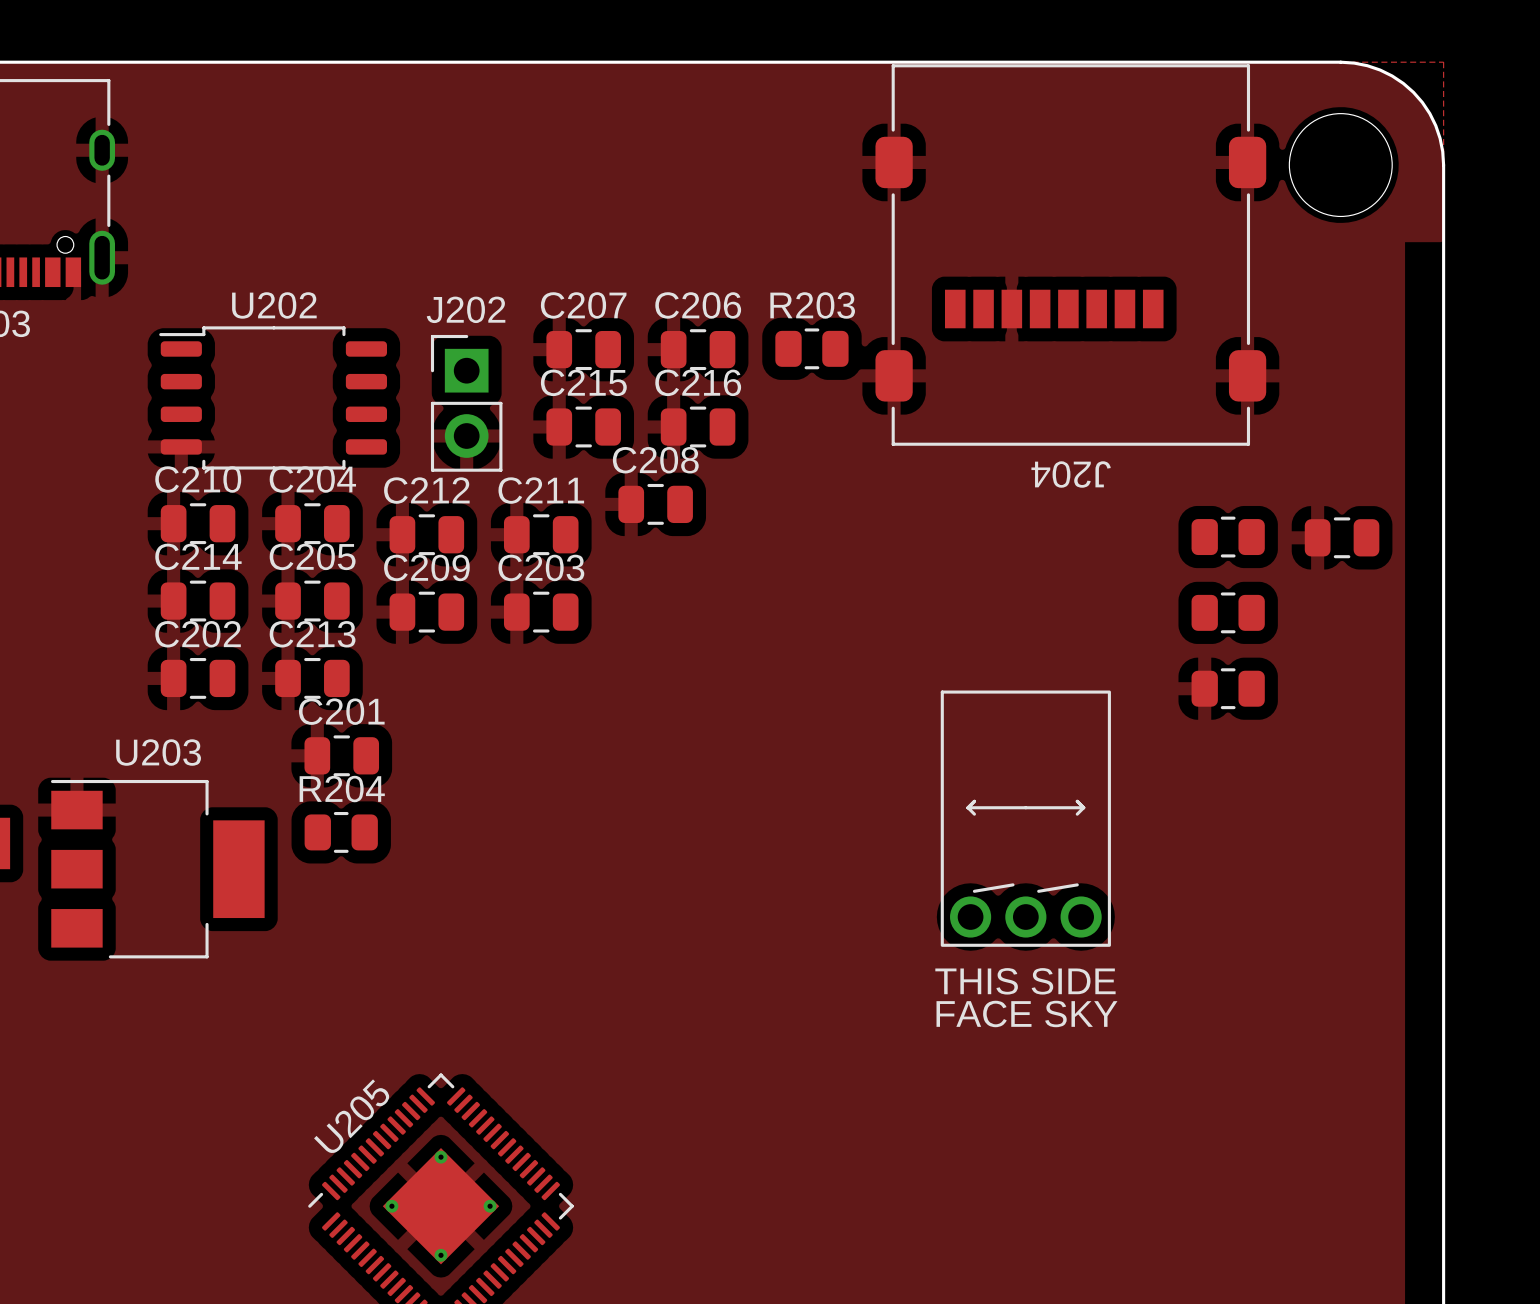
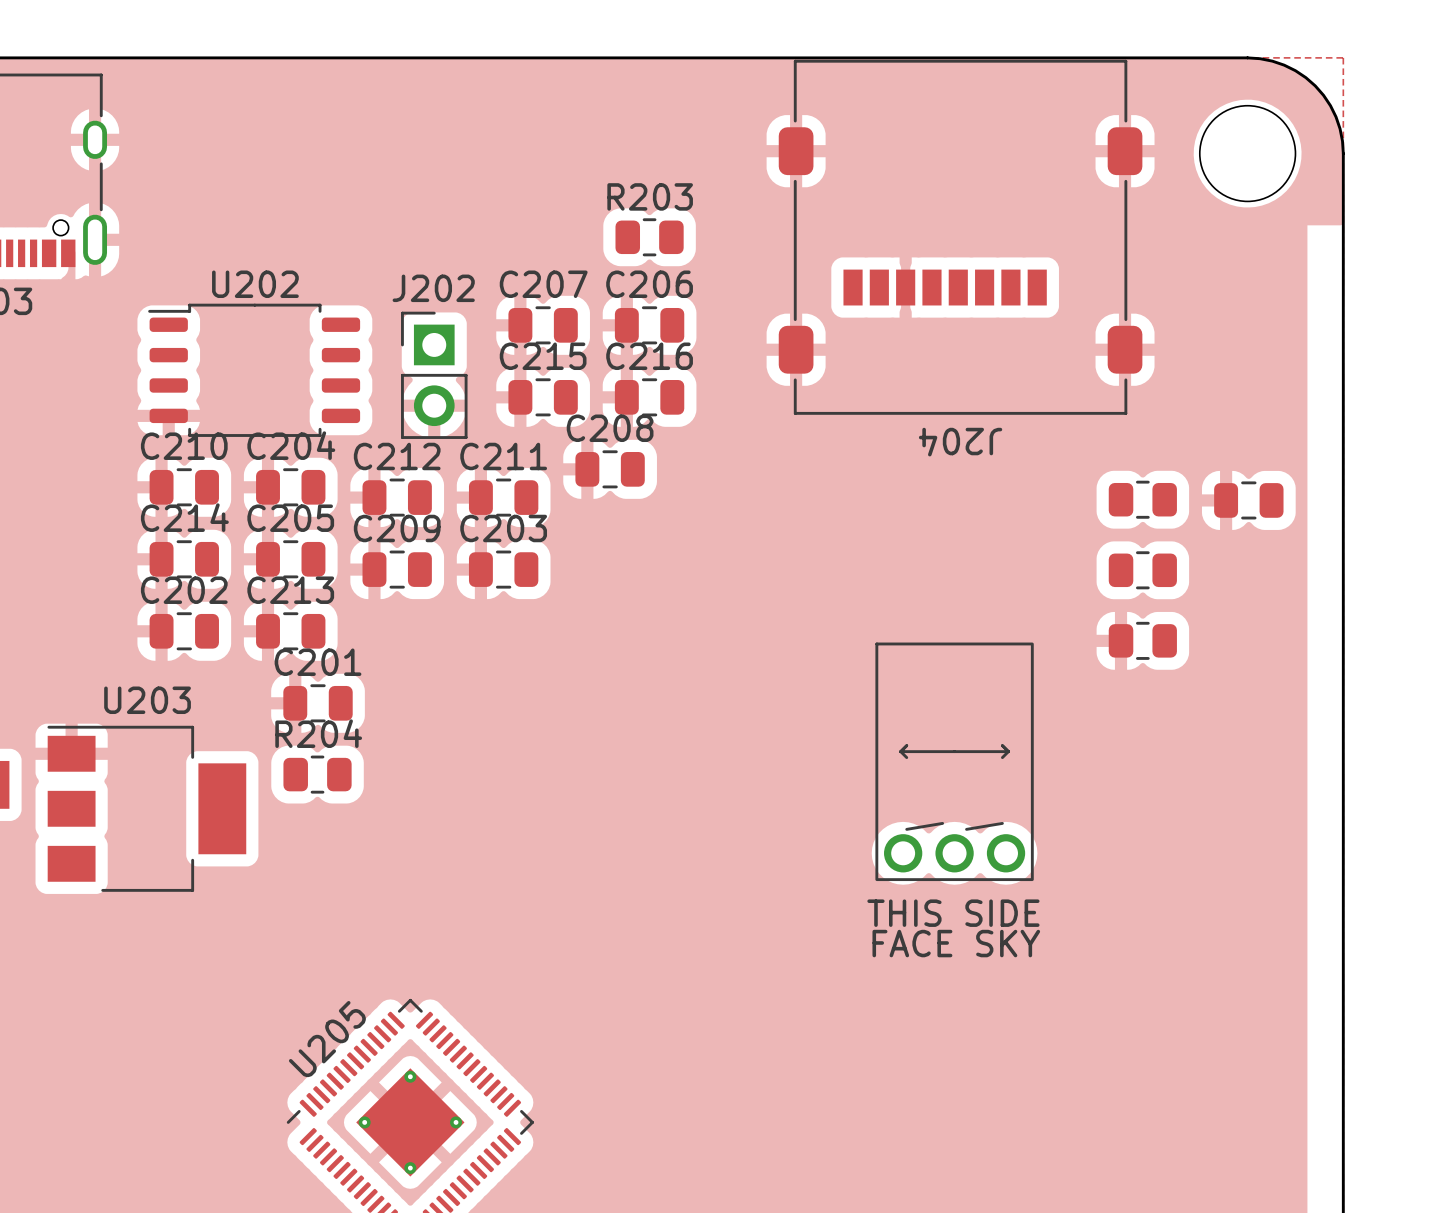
J204 position: (1070, 255) -> (960, 237)
R203 position: (811, 348) -> (649, 237)

